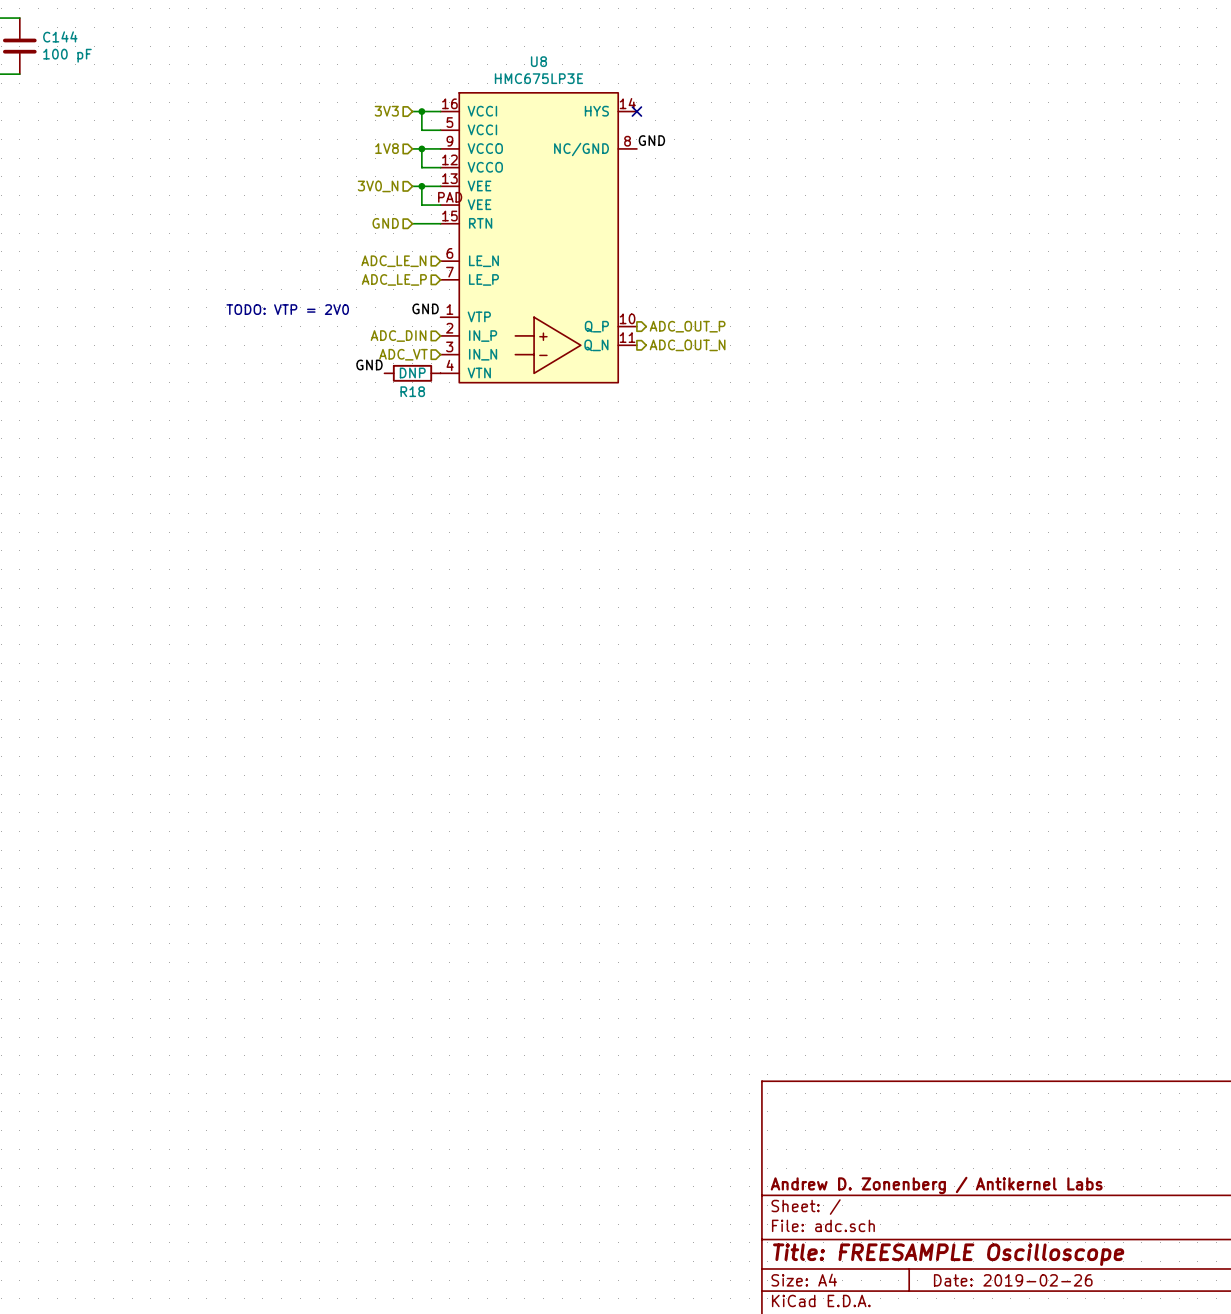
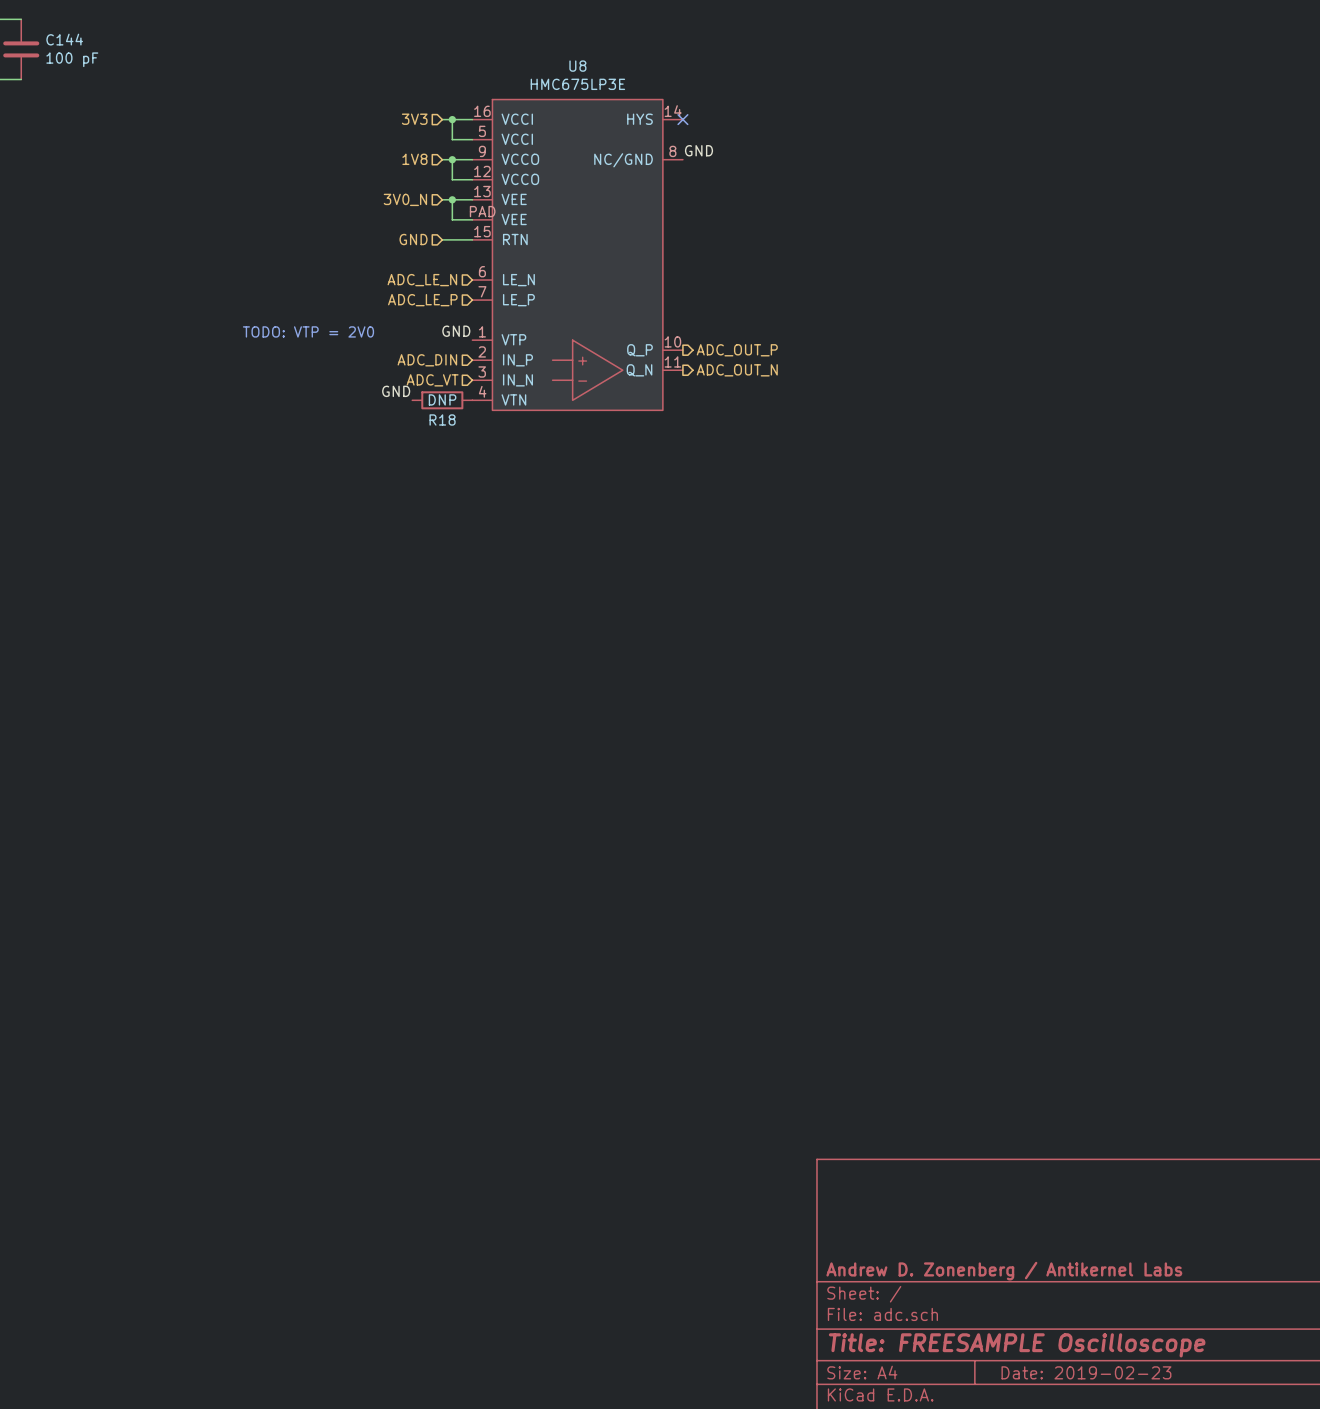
title block: Date: 2019-02-26 (1013, 1280) -> Date: 2019-02-23 (1086, 1372)

